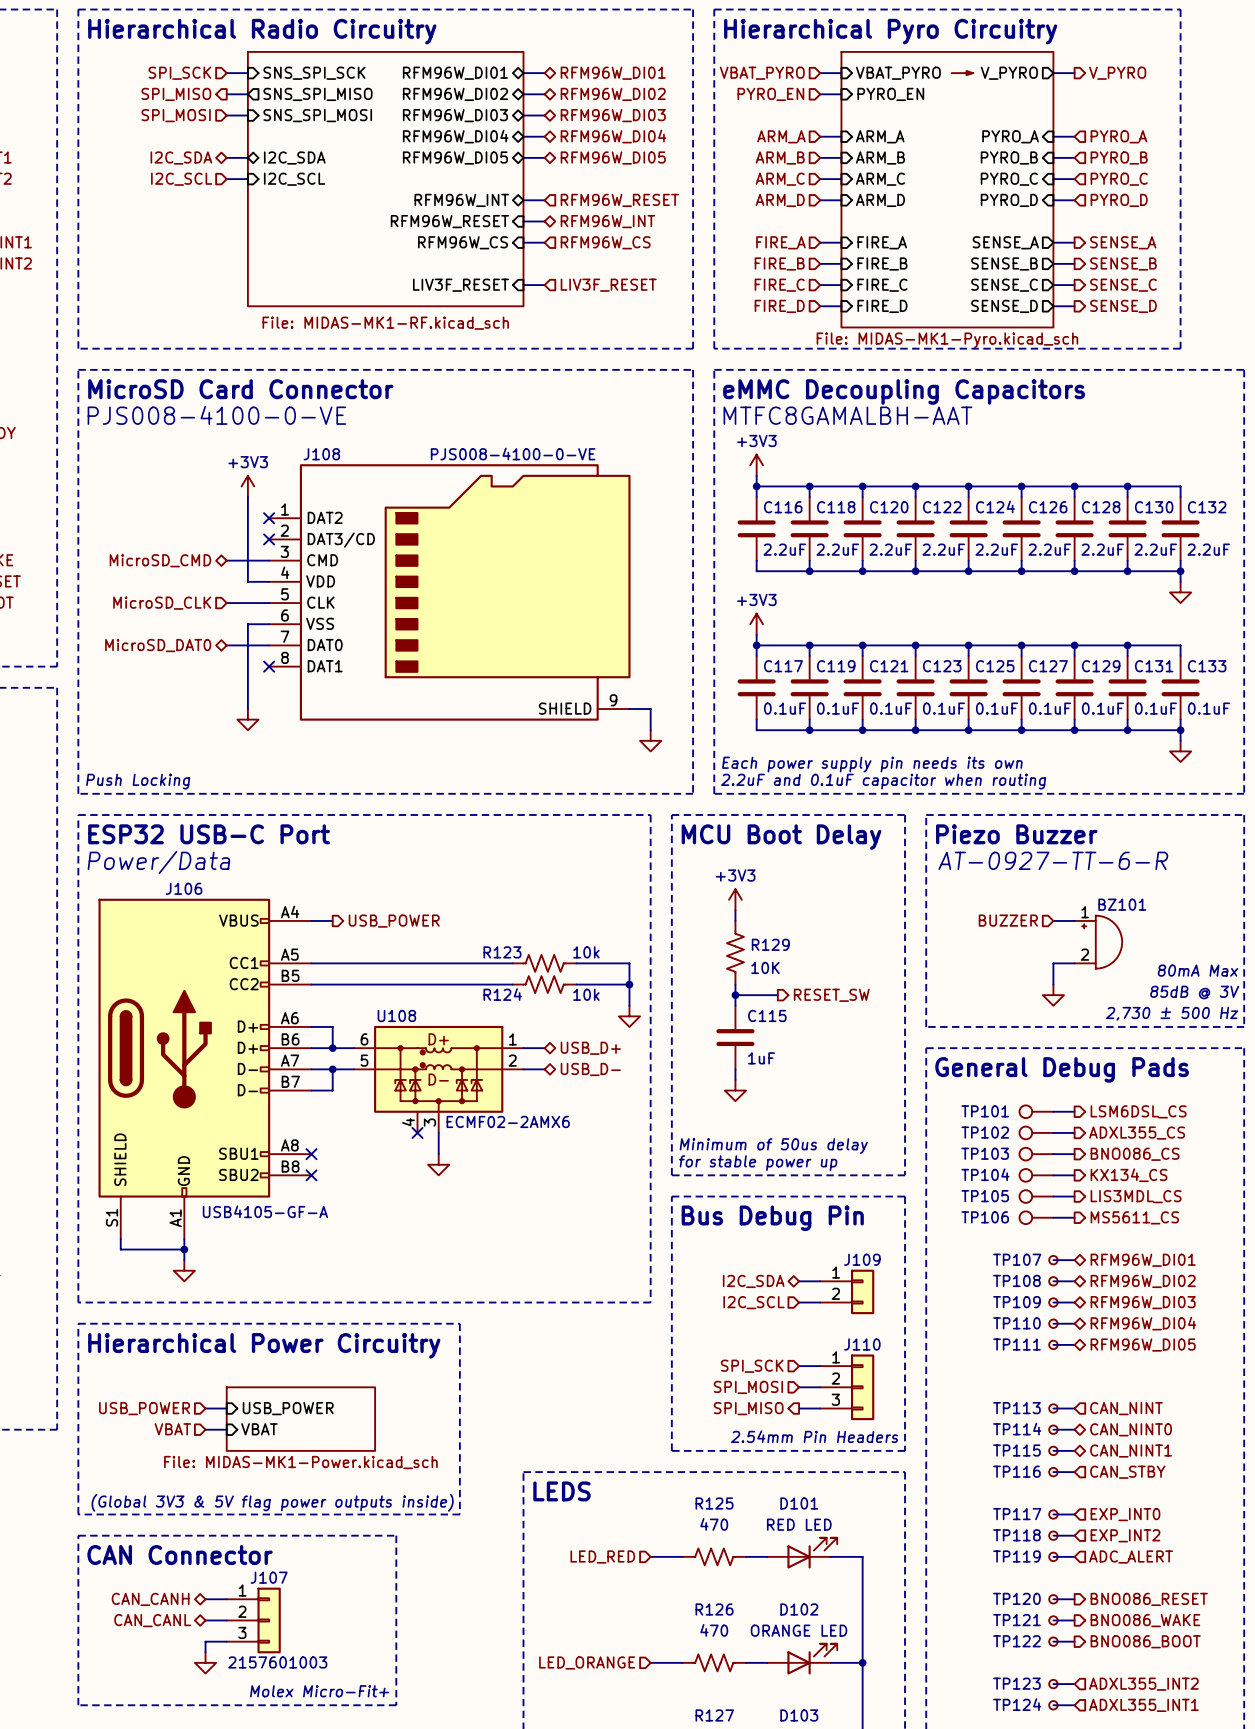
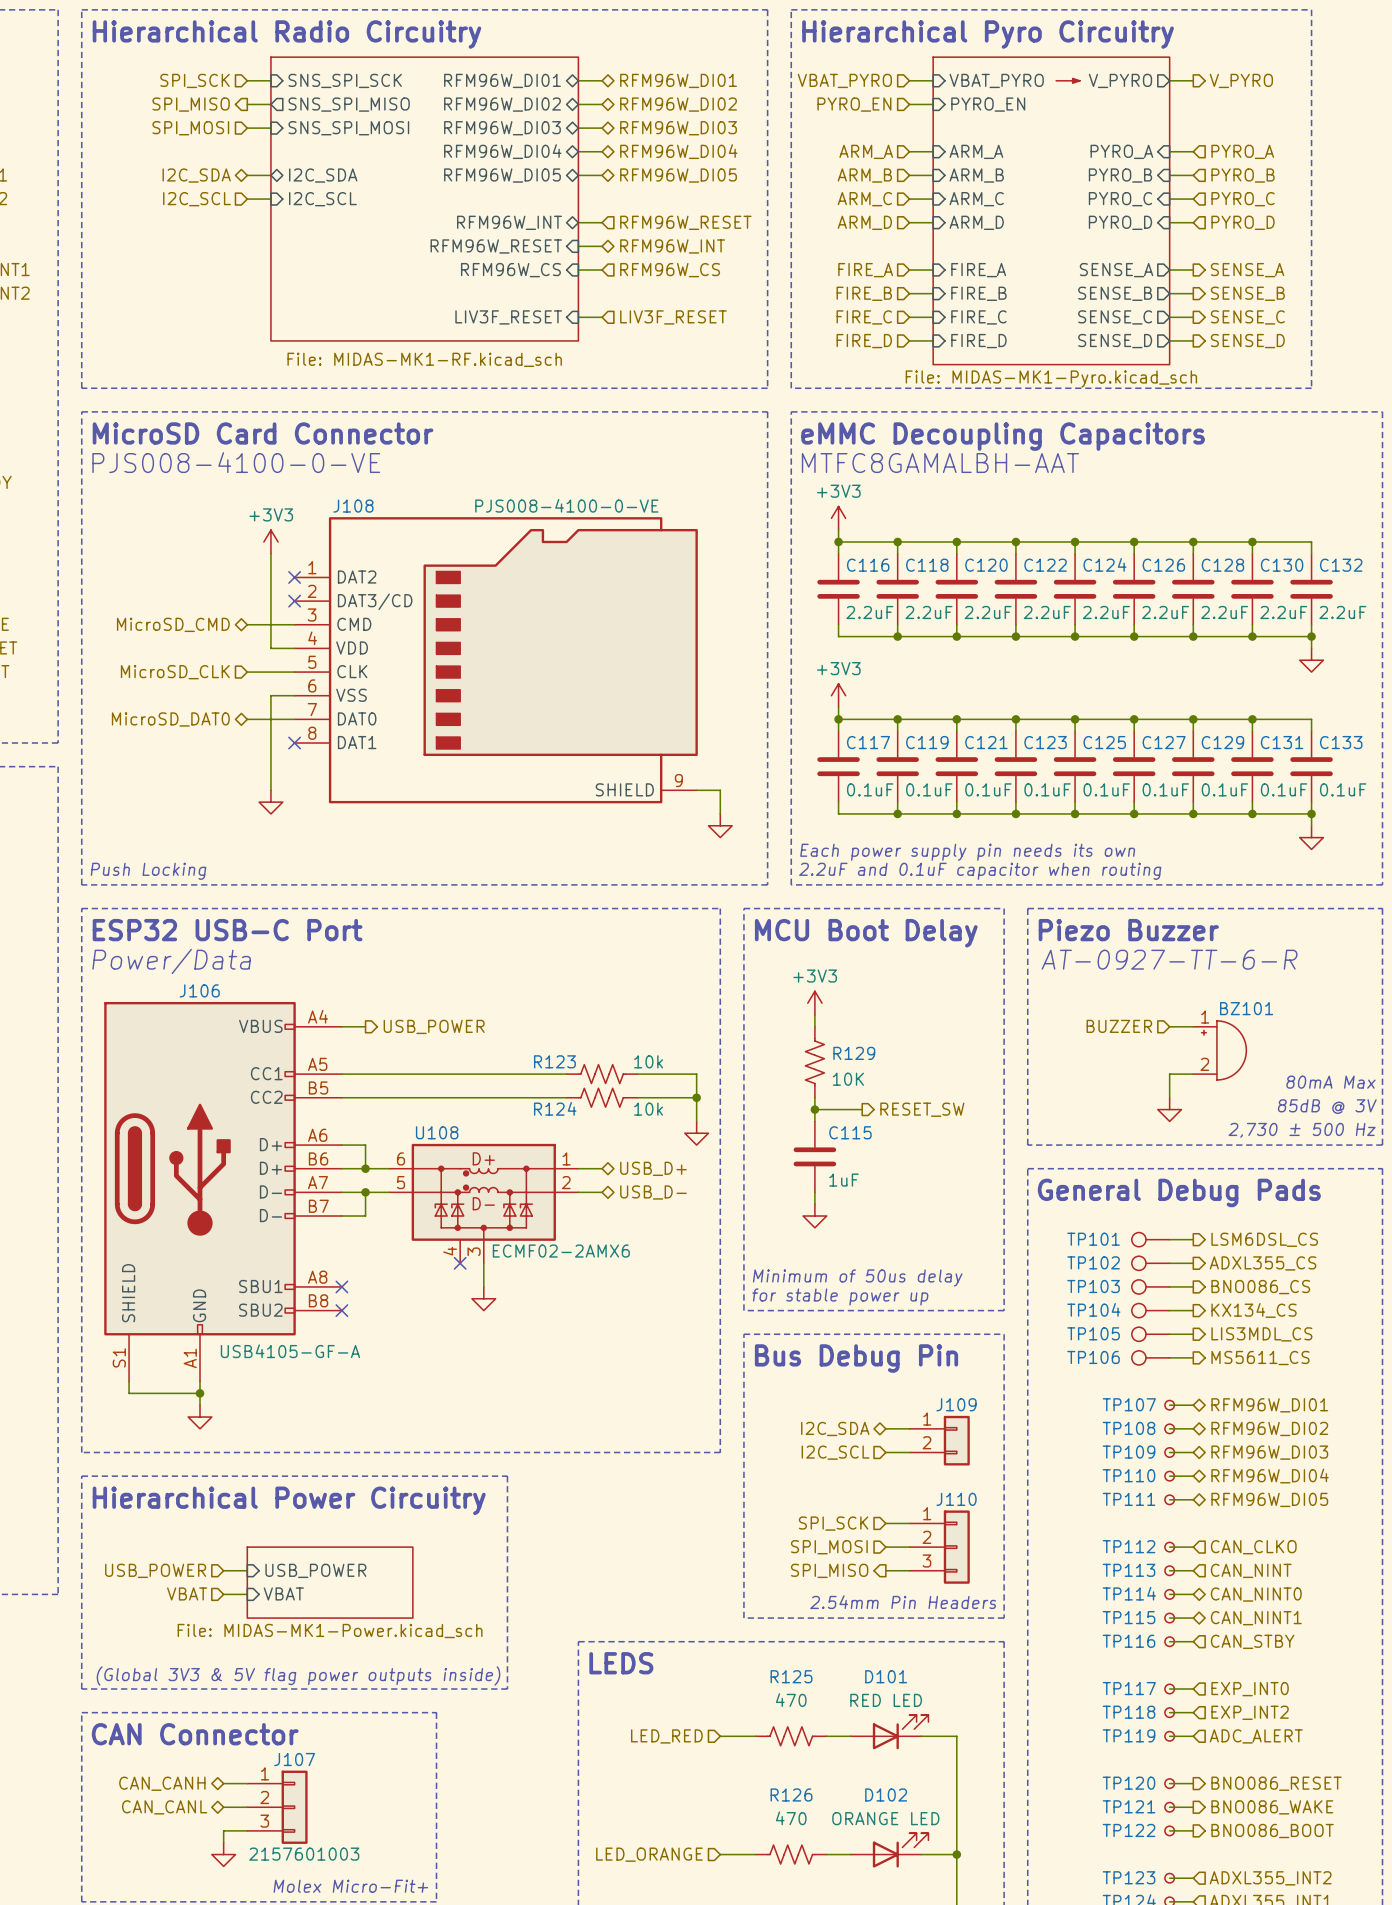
wire: none -> (1169, 1547) (1193, 1547)
TP112: none -> (1169, 1547)
hierarchical label: none -> CAN_CLKO (1253, 1547)

